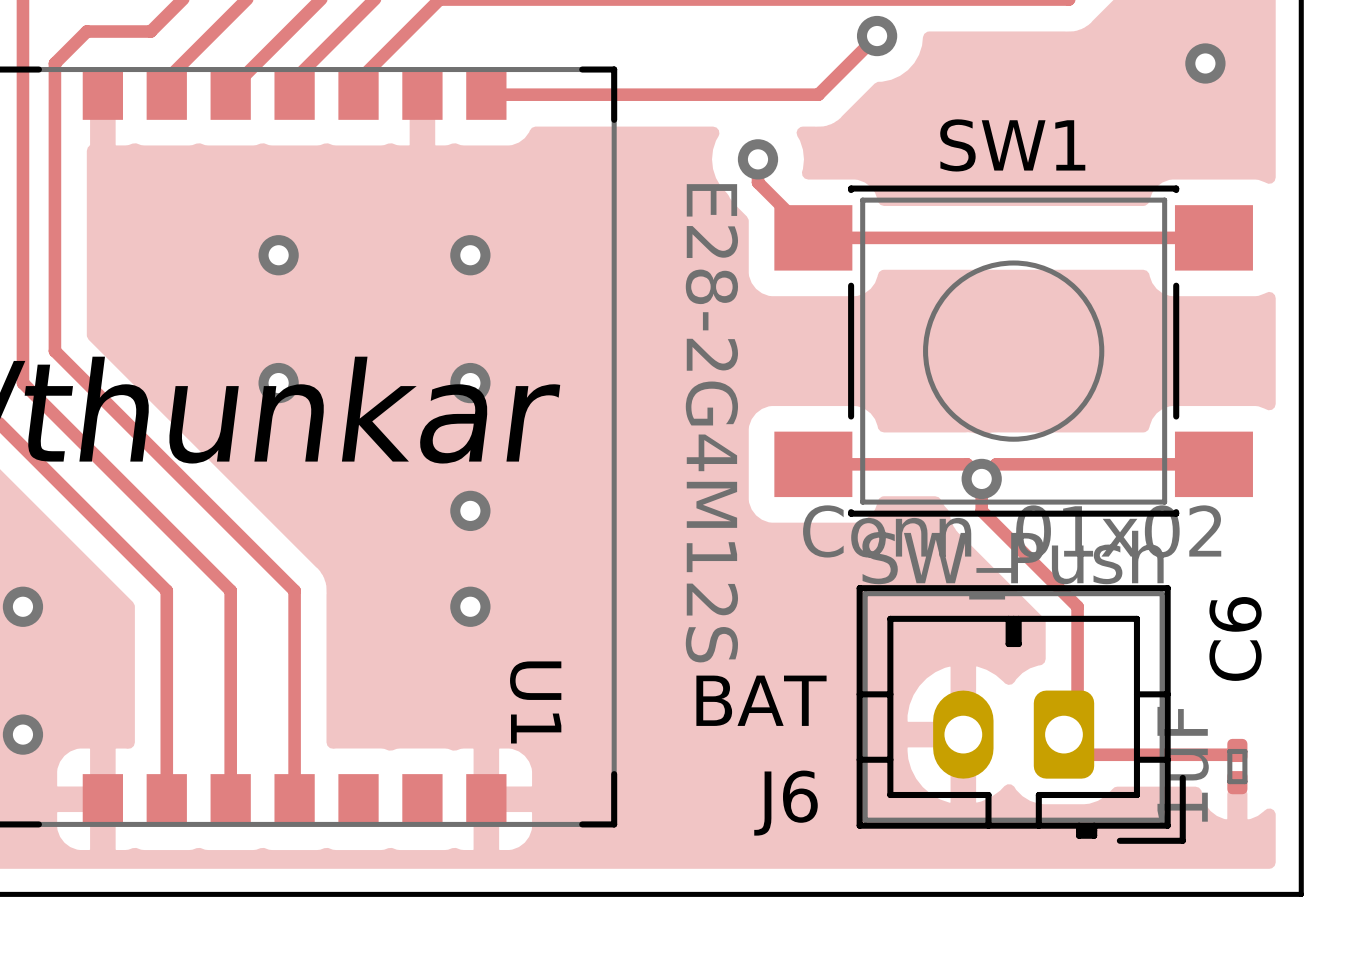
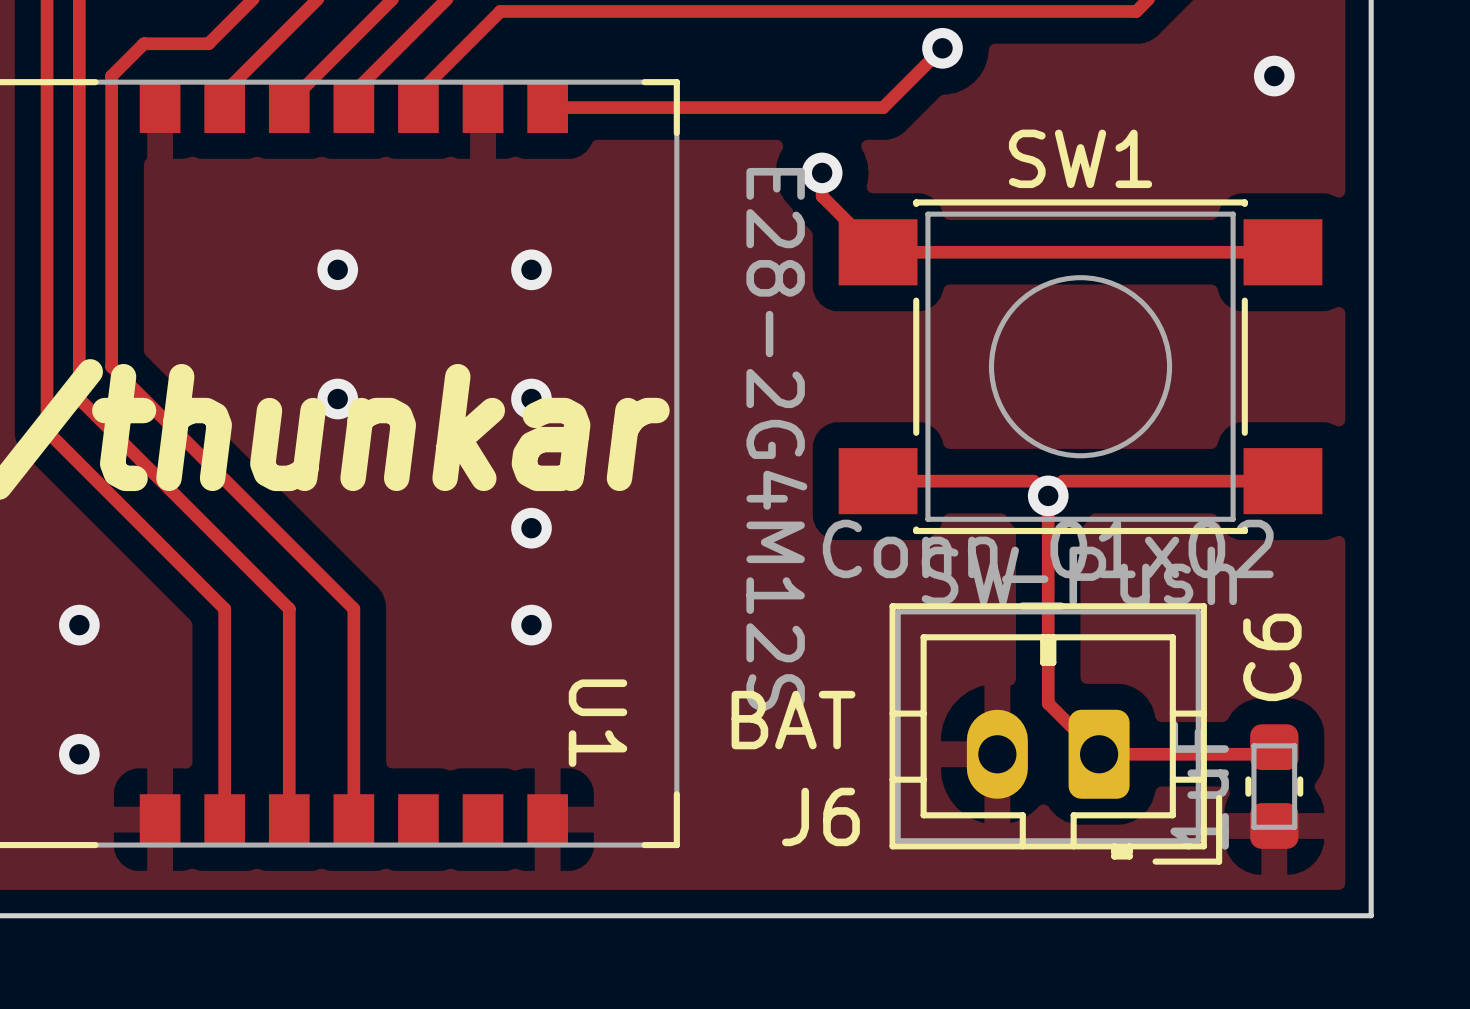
track: (981, 510) (1077, 606) (1077, 721) (1063, 734) (1084, 754) (1237, 754) (1237, 750) -> (1048, 528) (1048, 703) (1099, 754) (1267, 754) (1274, 747)
text position: BAT (761, 700) -> BAT (793, 720)
J6 position: (1021, 714) -> (1055, 733)
C6 footprint: [1227, 738, 1248, 795] -> [1245, 724, 1304, 849]

